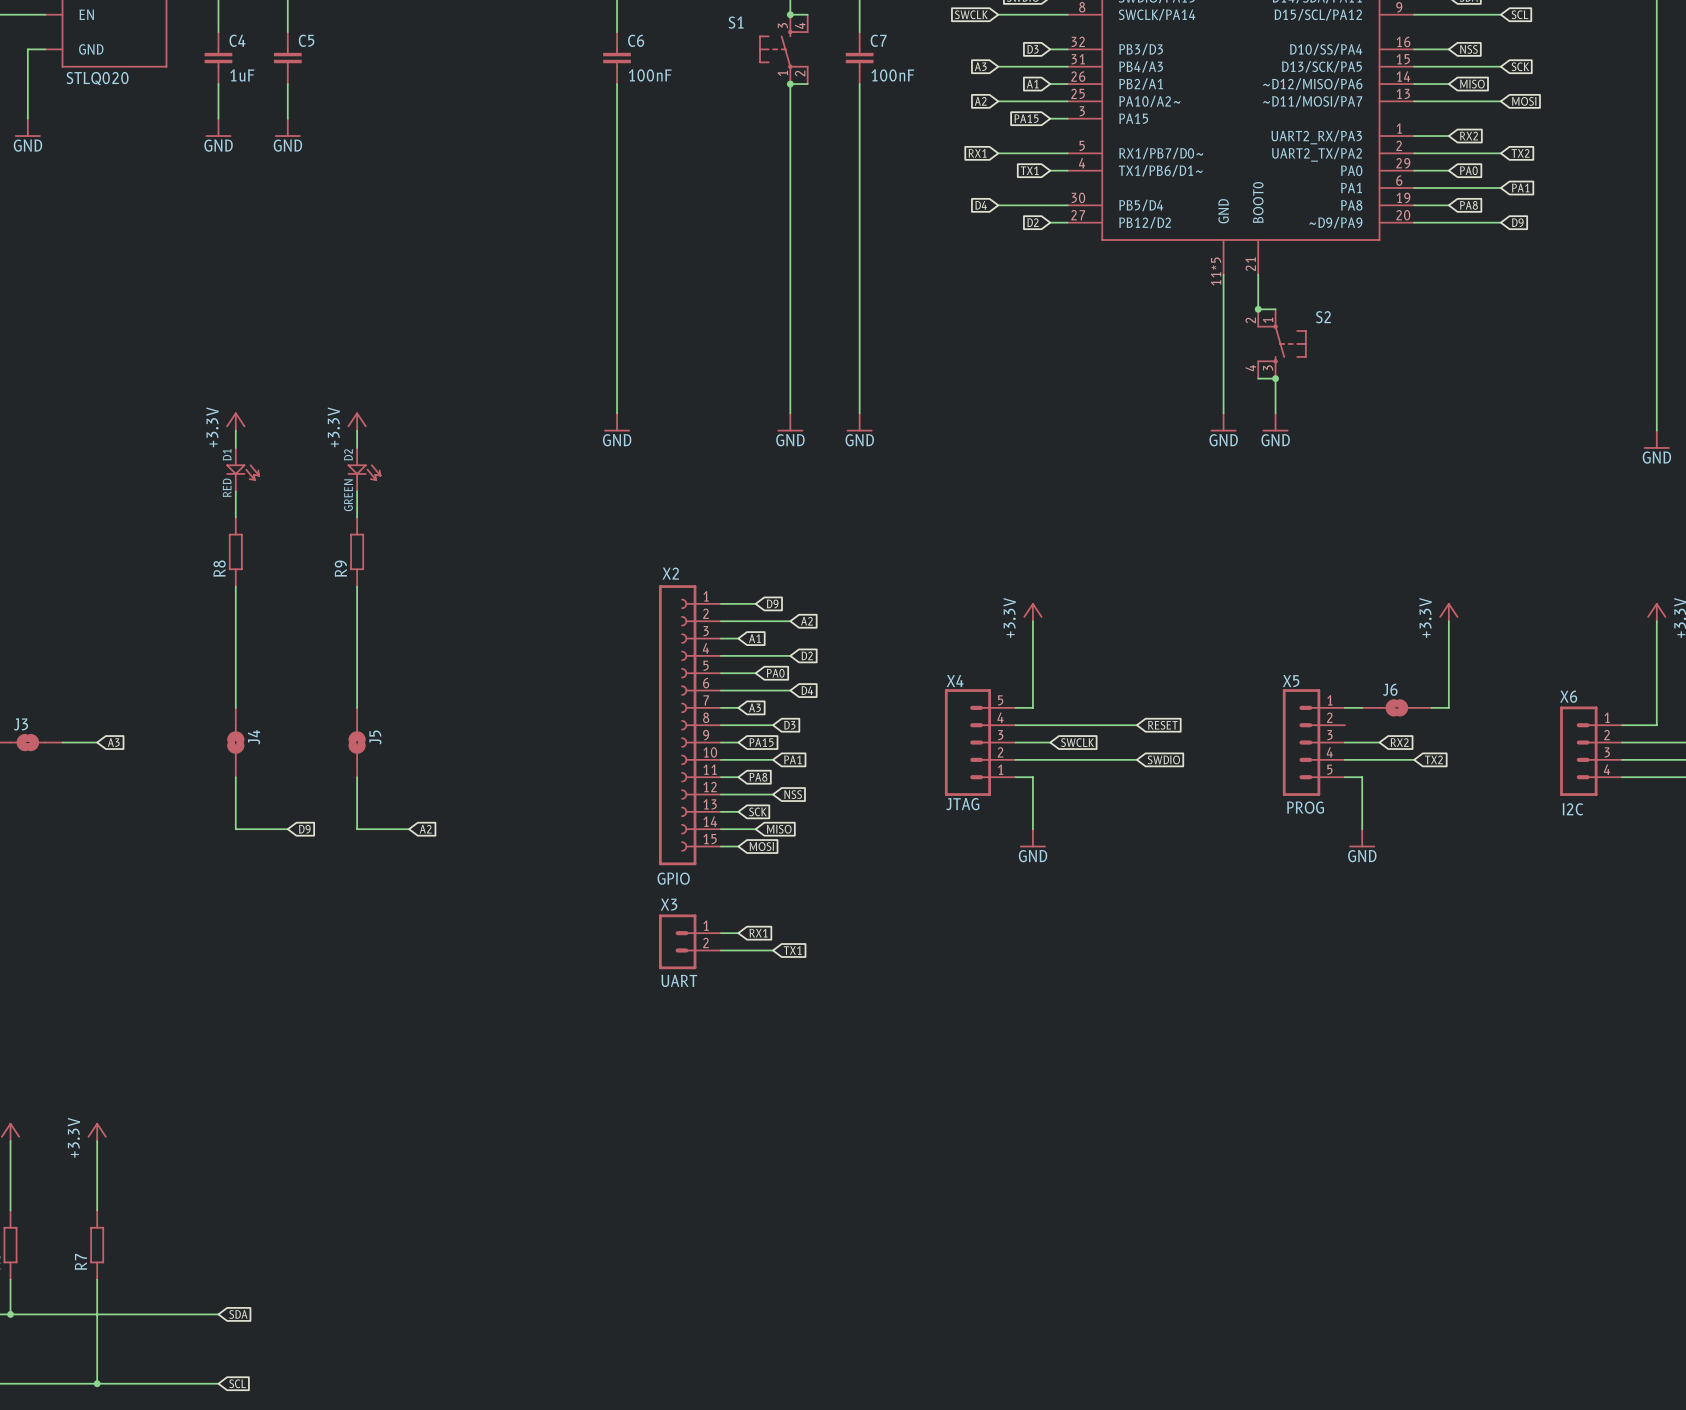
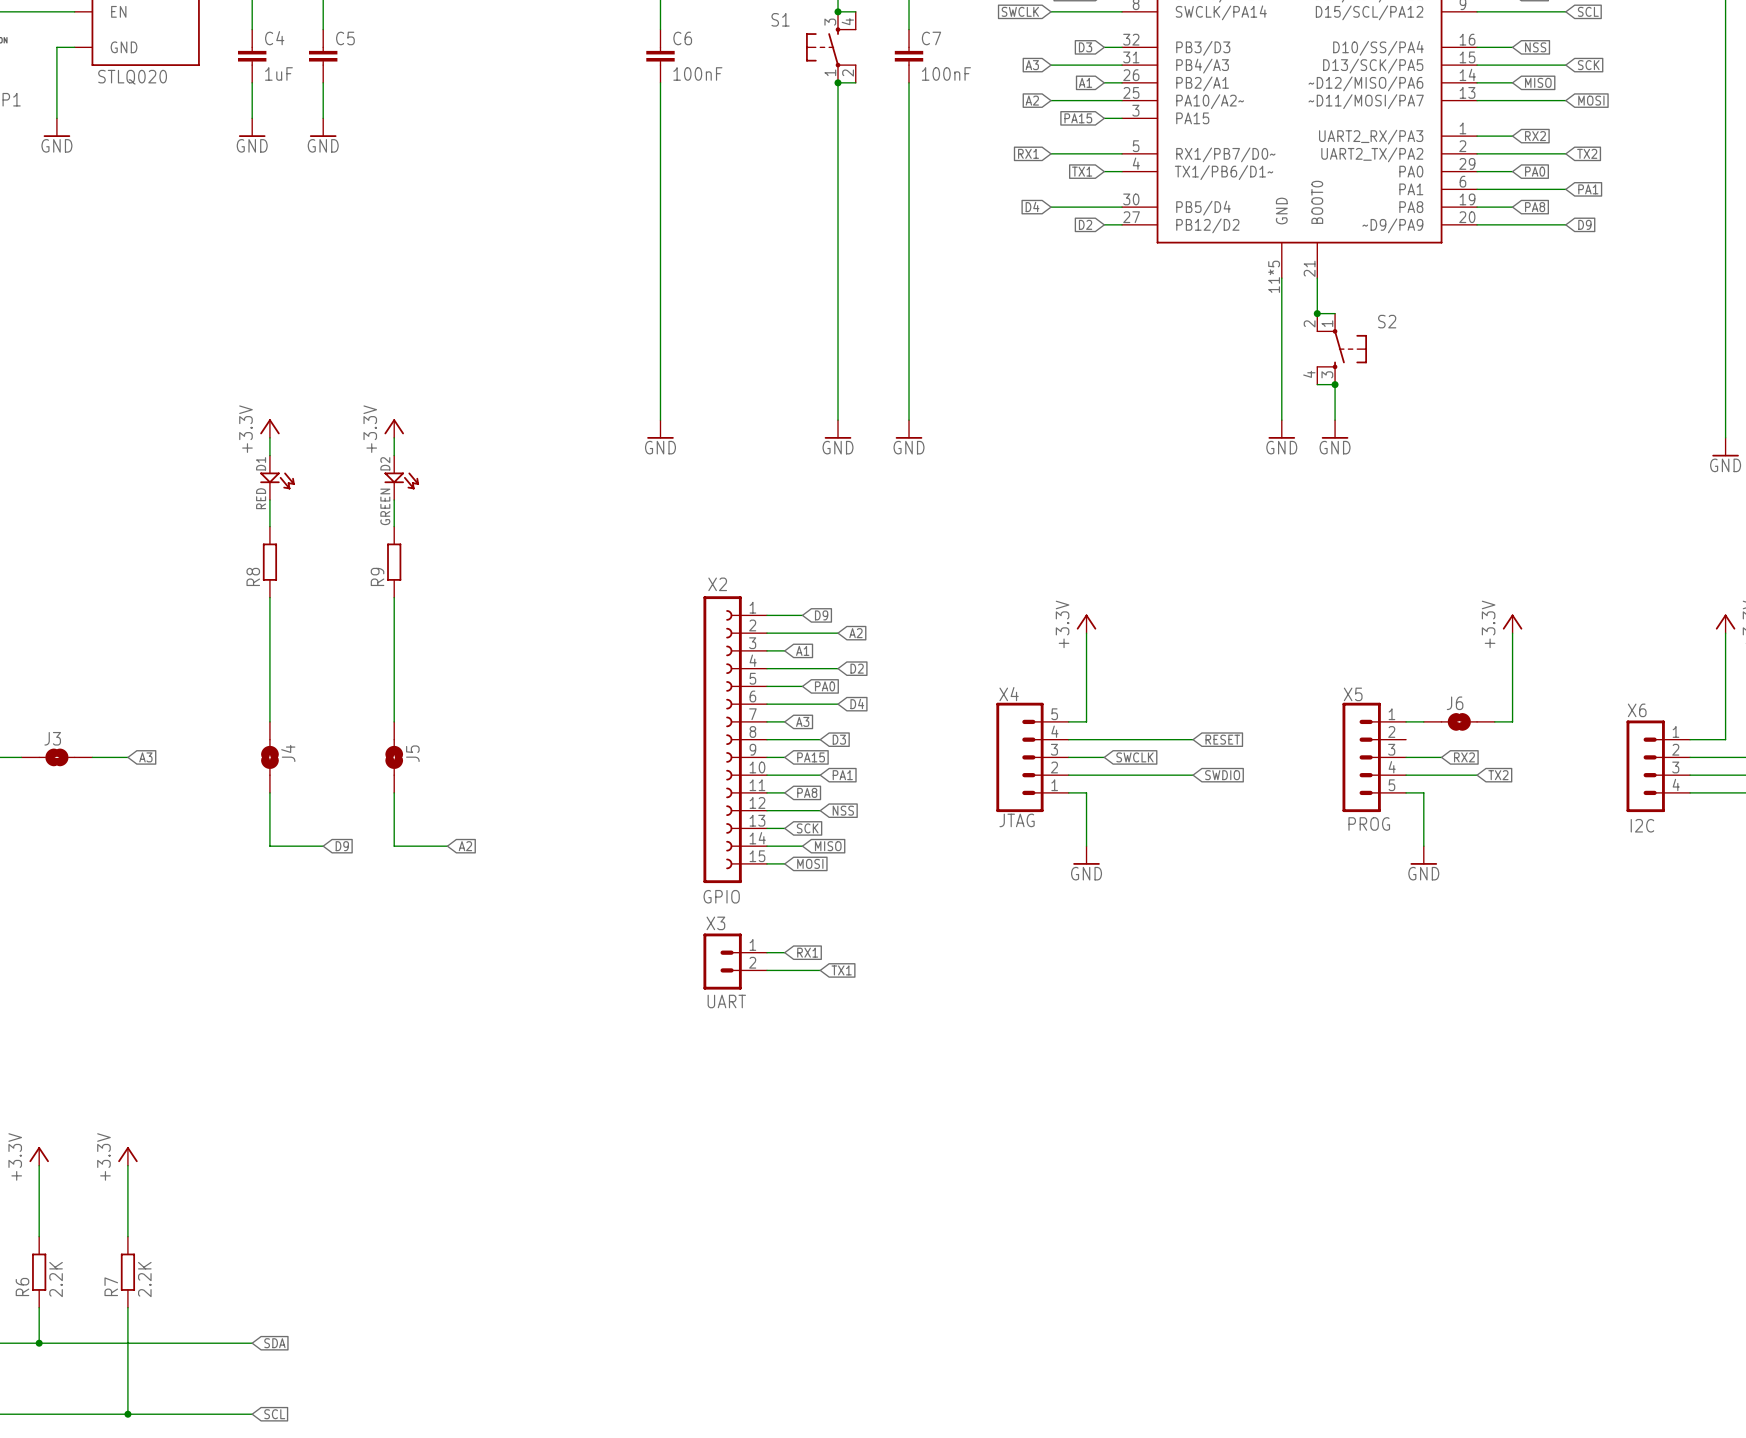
R6 value: none -> 2.2K (56, 1279)
R7 value: none -> 2.2K (144, 1279)

